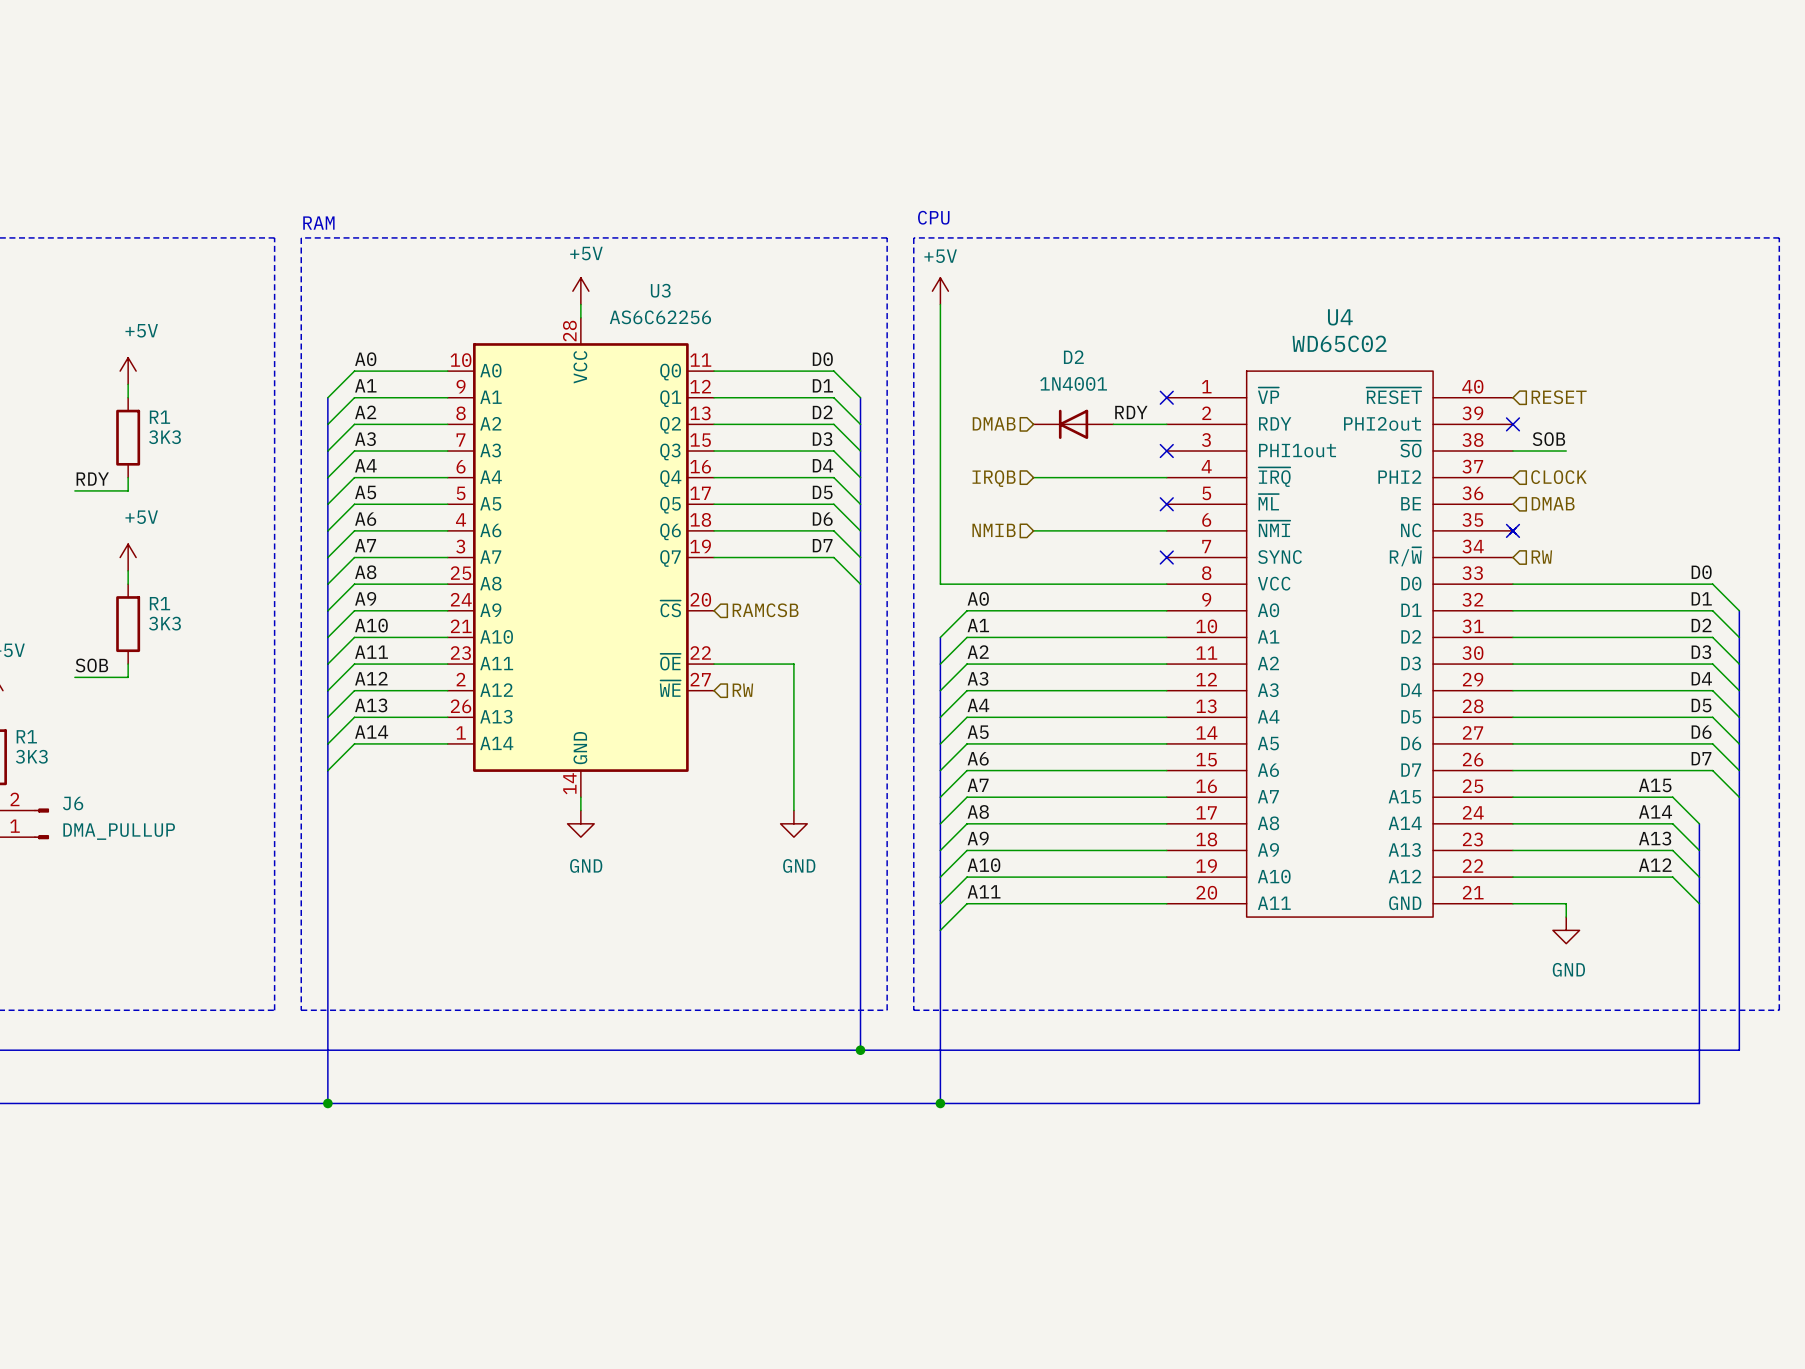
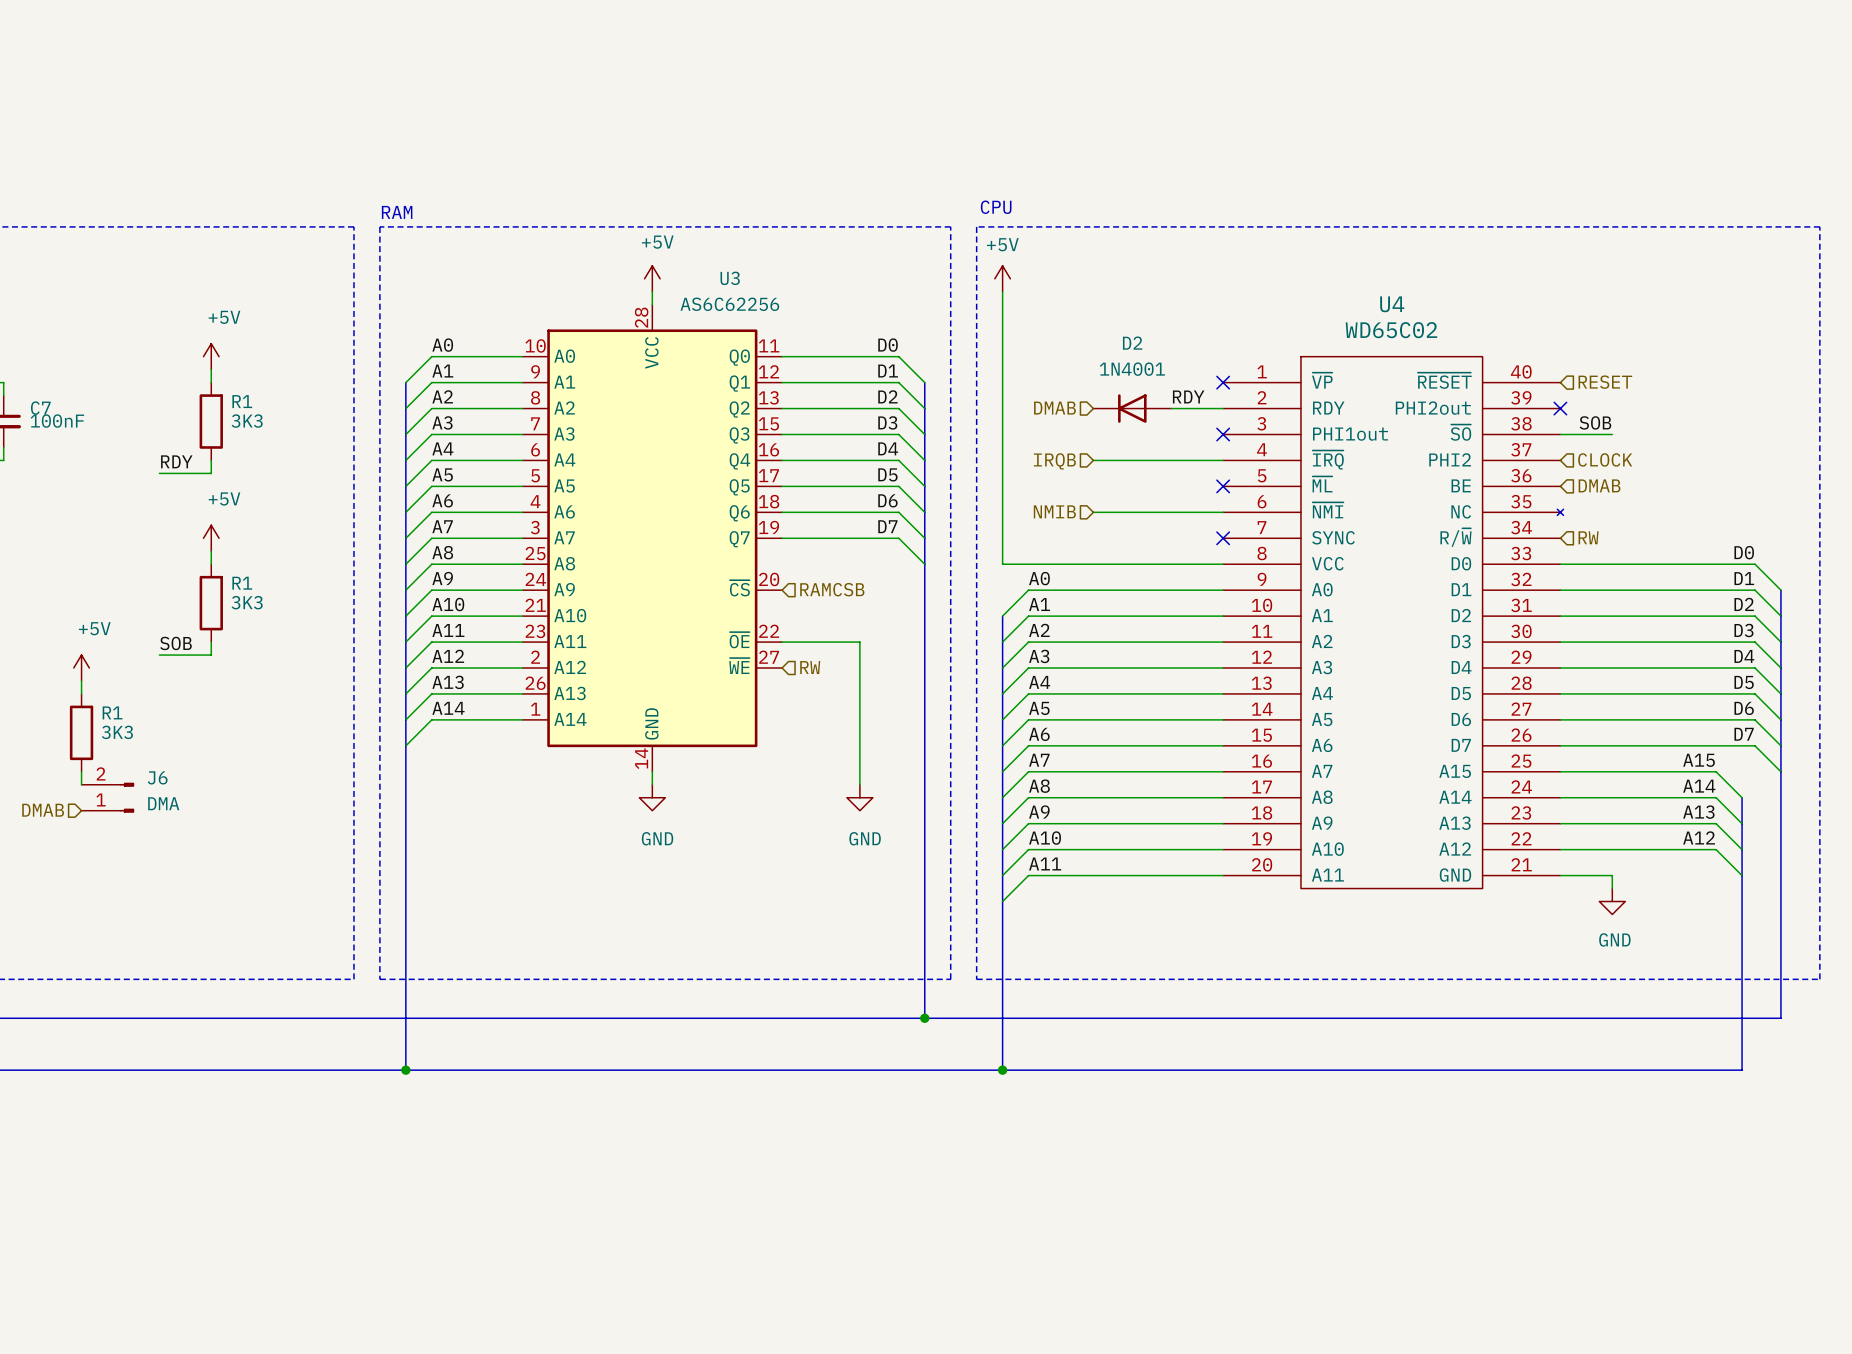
no-connect mark: (1512, 530) -> none
J6 value: DMA_PULLUP (119, 831) -> DMA (163, 803)

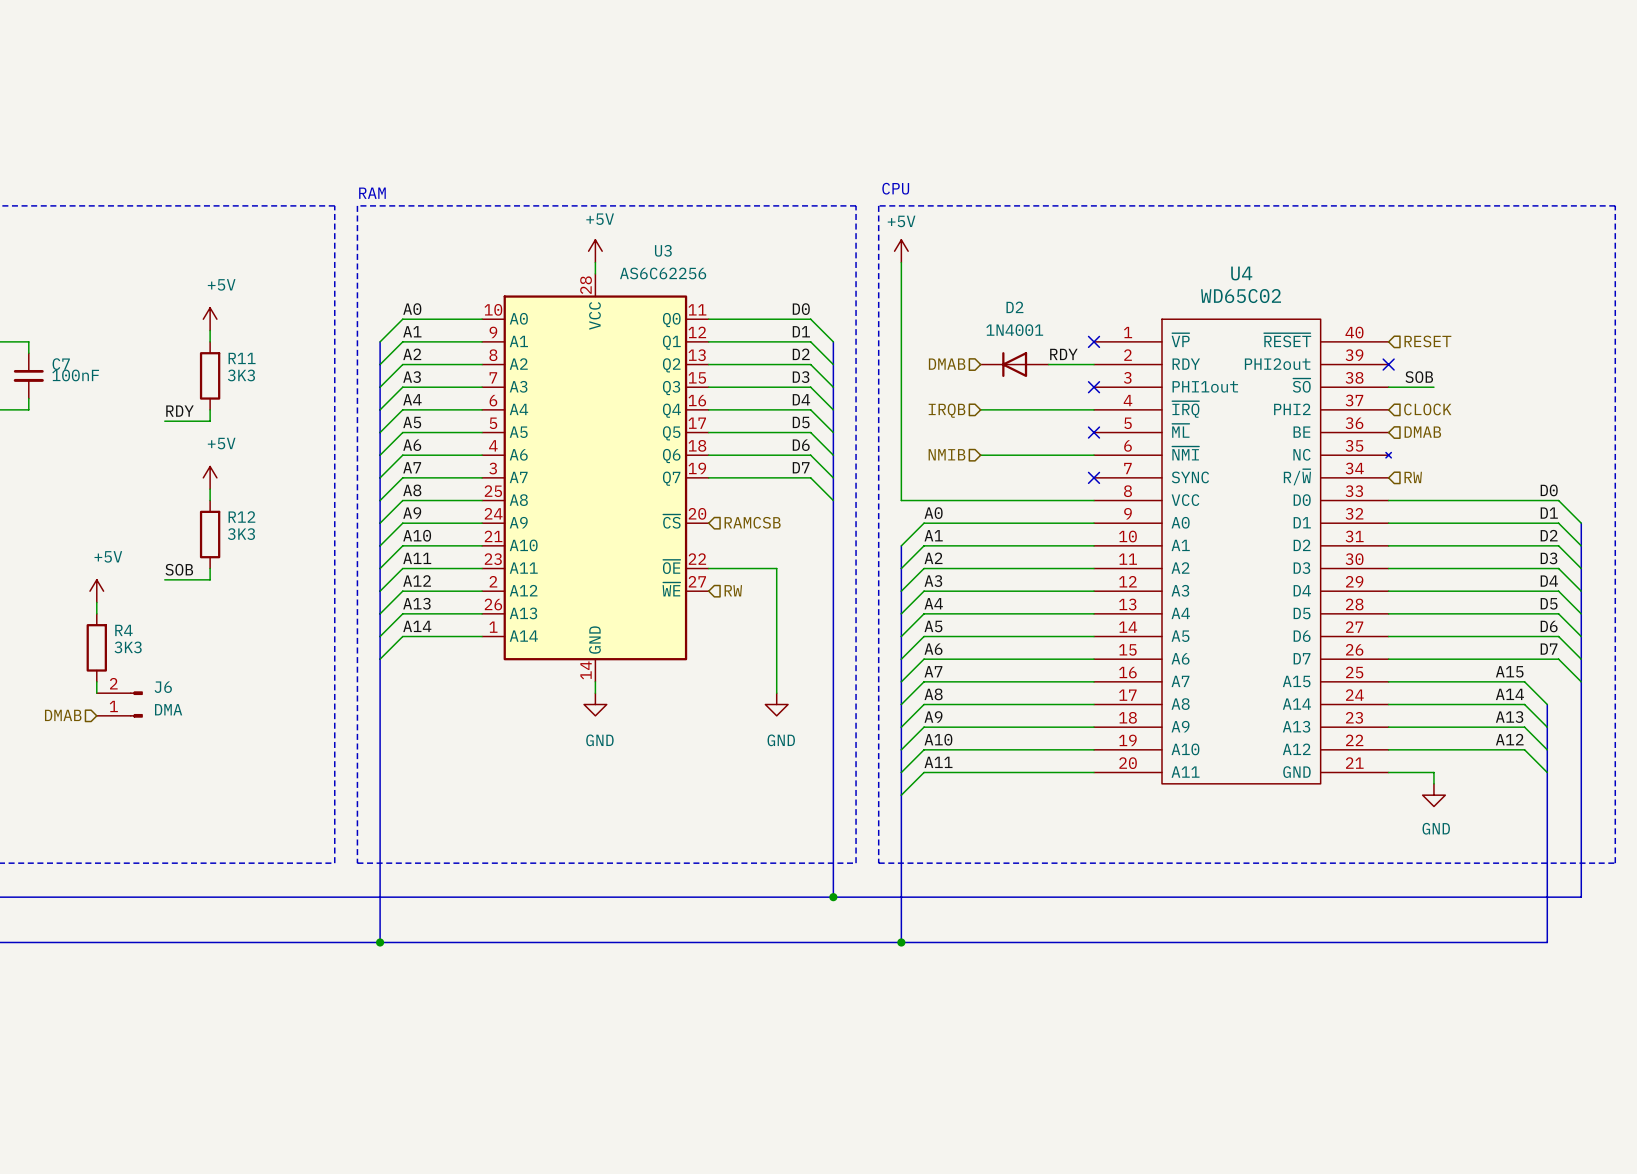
R1 name: R1 (242, 401) -> R11 (242, 358)
R1 name: R1 (242, 583) -> R12 (241, 517)
R1 name: R1 (112, 712) -> R4 (123, 630)

